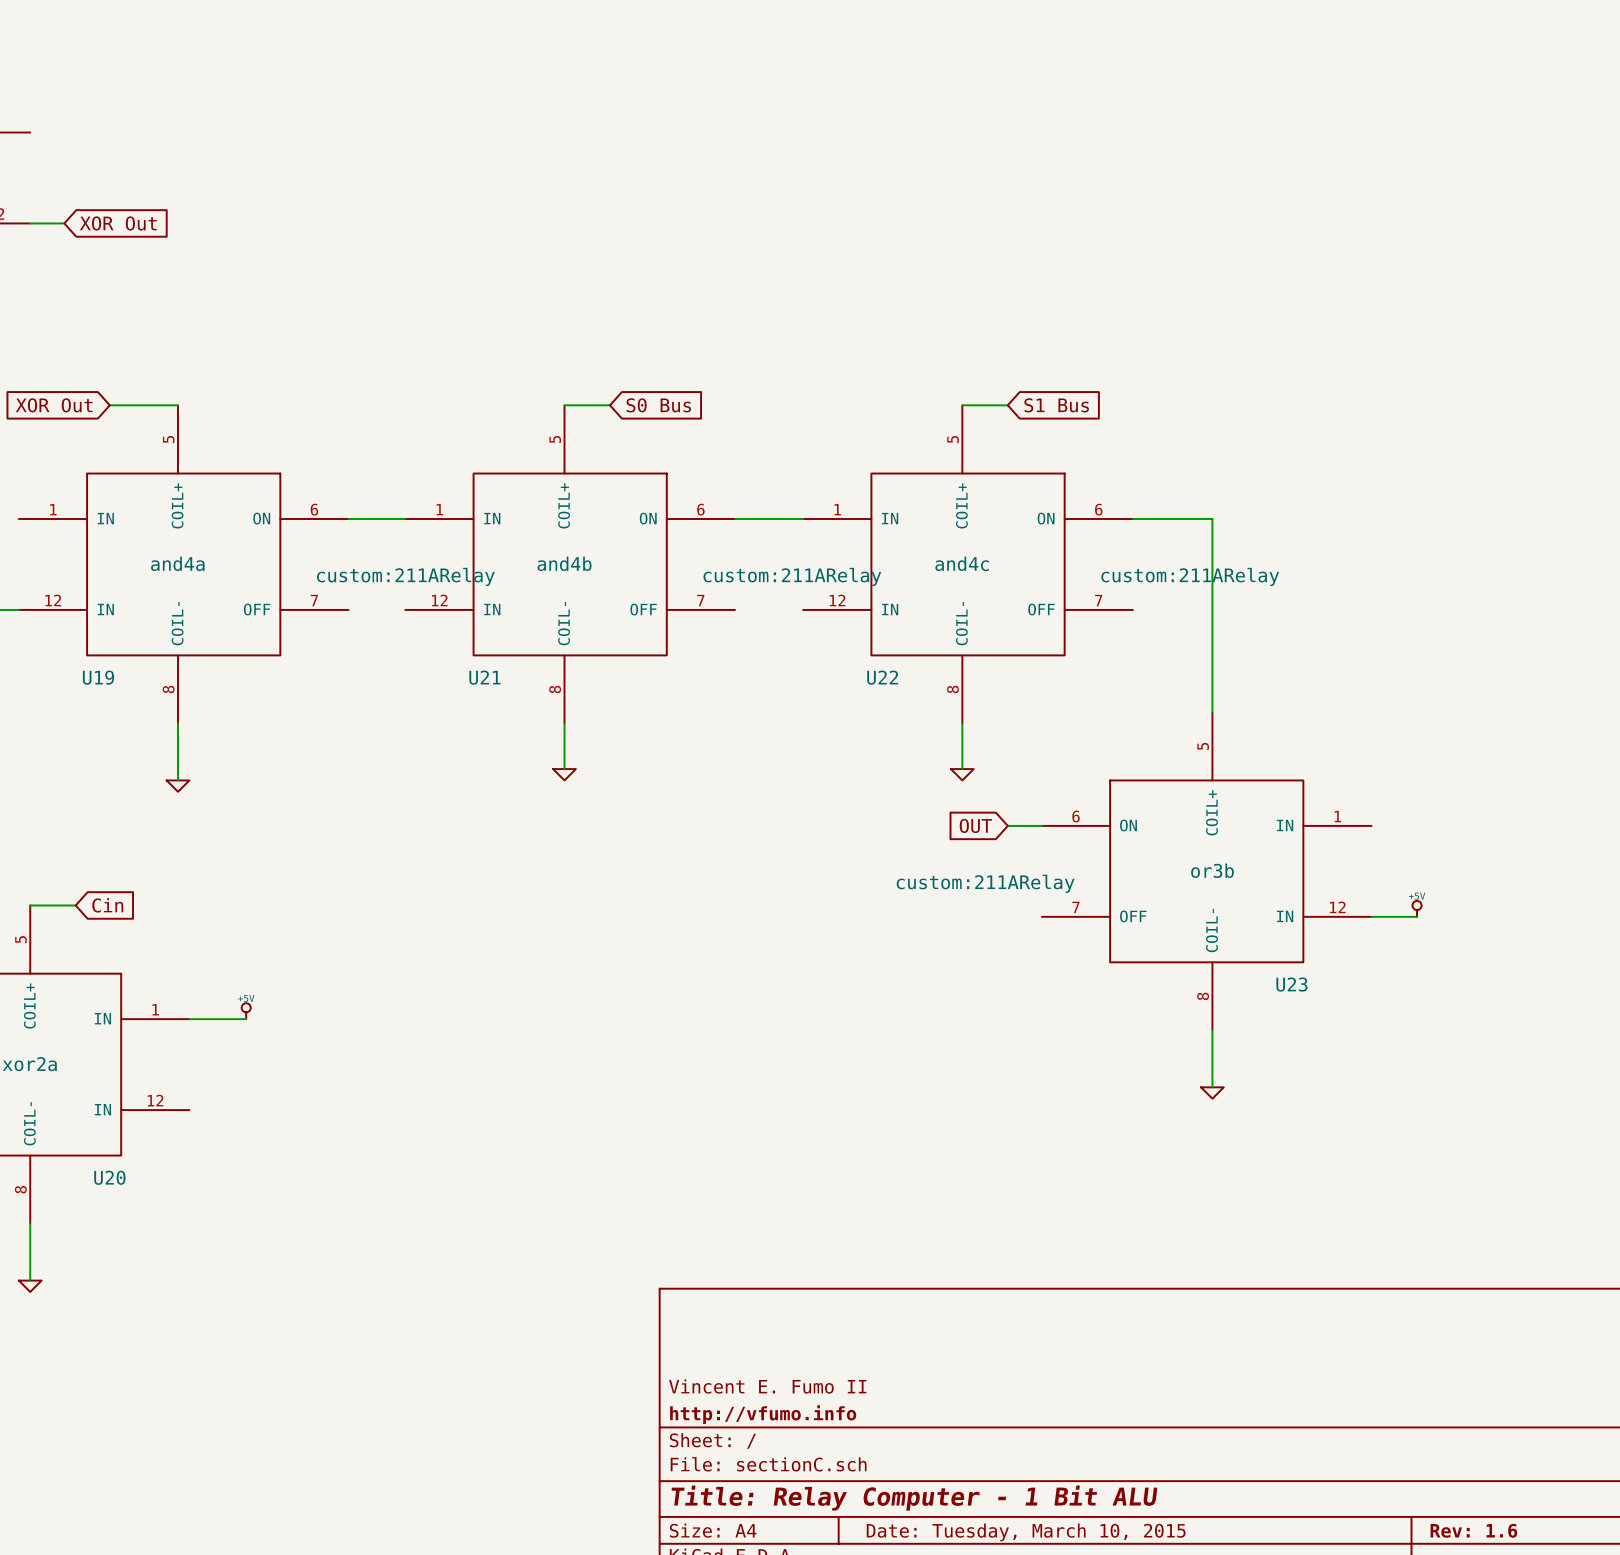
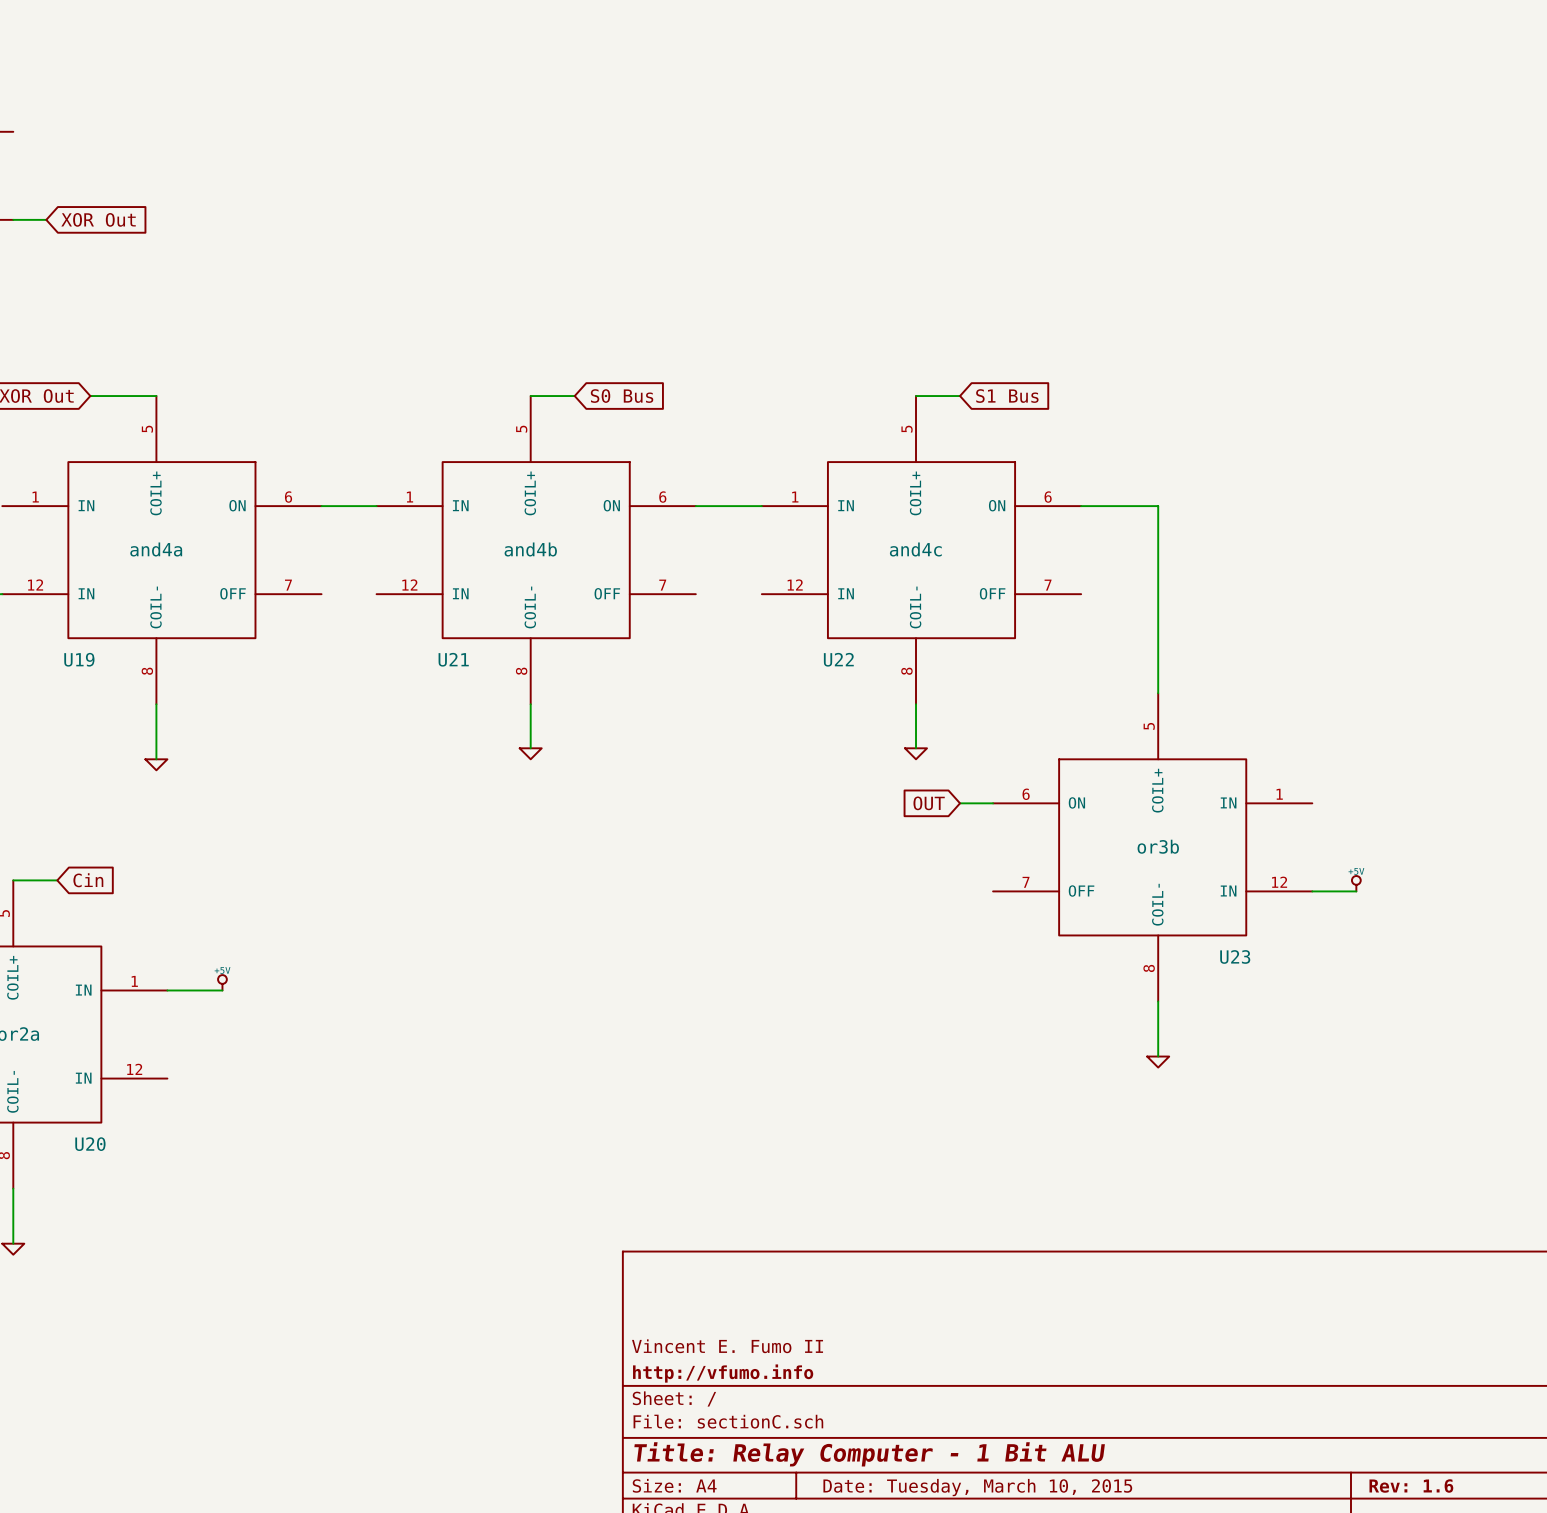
U19 text: custom:211ARelay (405, 576) -> none
U21 text: custom:211ARelay (792, 576) -> none
U22 text: custom:211ARelay (1190, 576) -> none
U23 text: custom:211ARelay (985, 883) -> none

